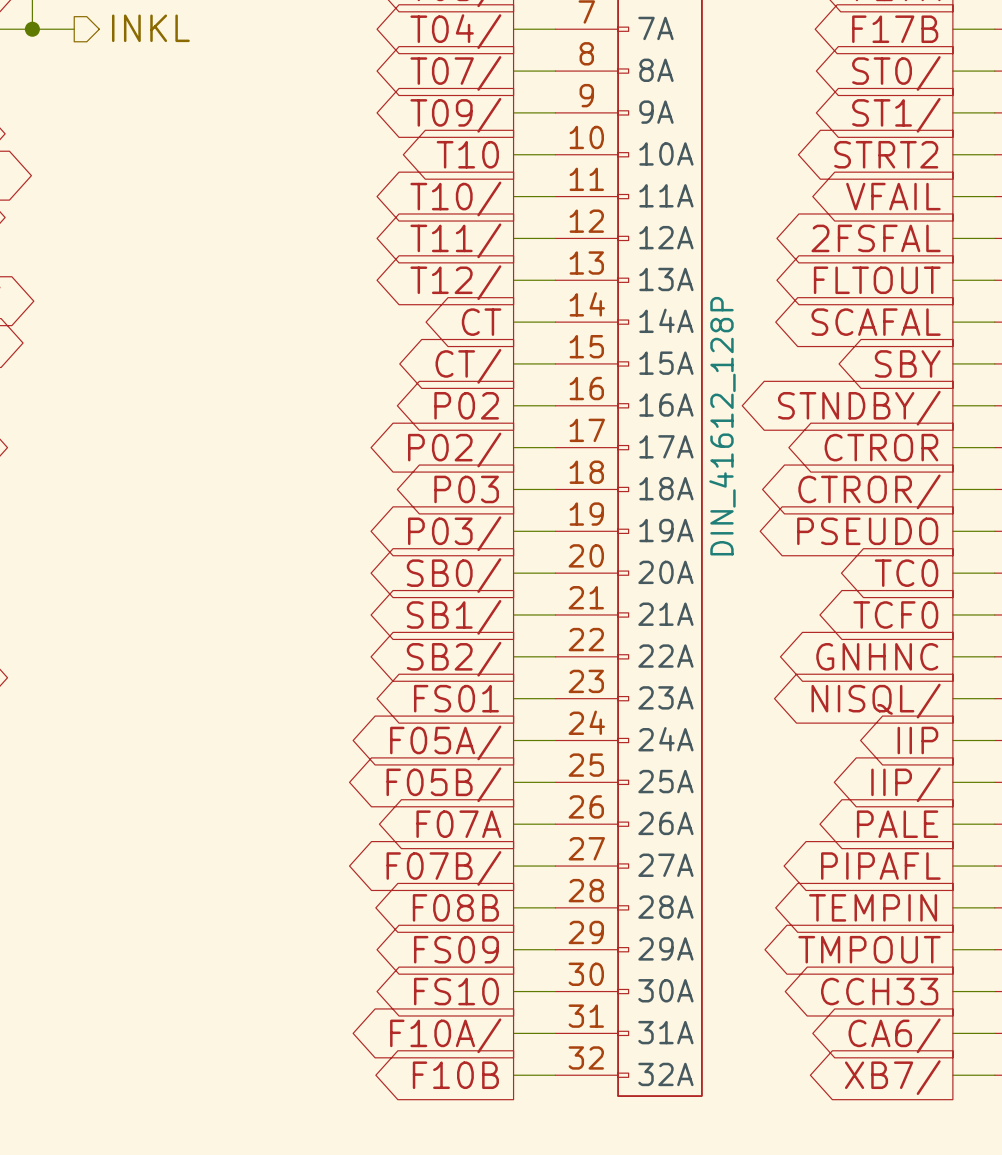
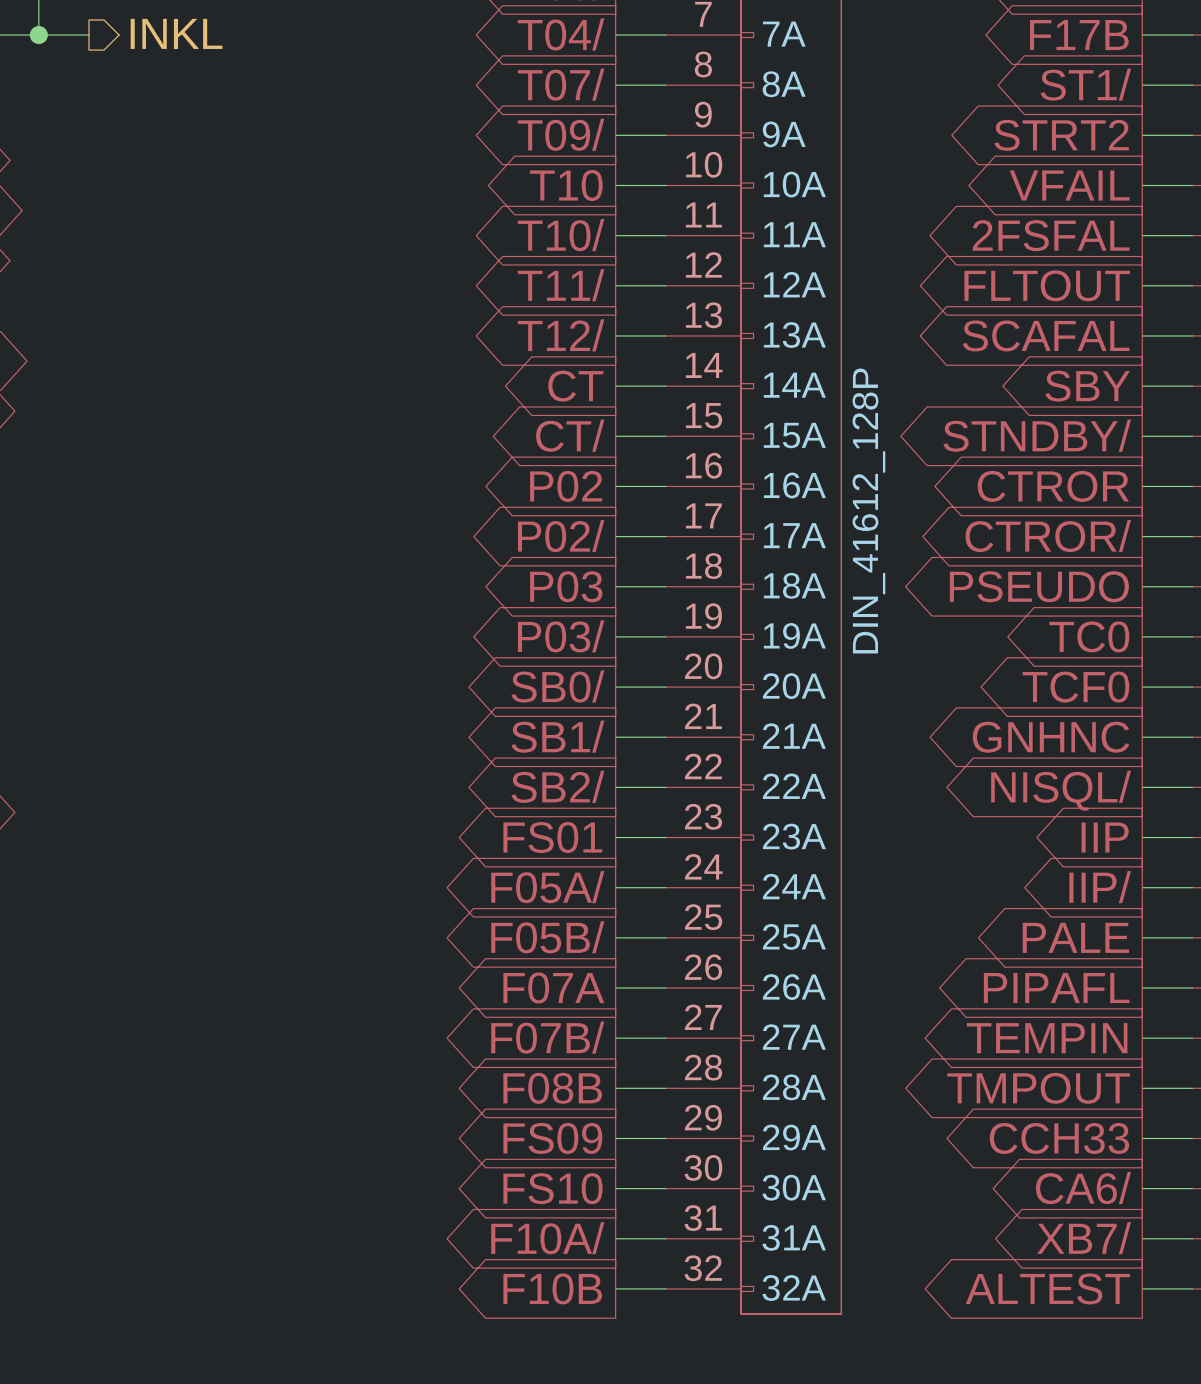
global label: ST0/ (896, 73) -> ST1/ (1085, 84)
global label: ST1/ (896, 115) -> STRT2 (1061, 135)
global label: STRT2 (886, 154) -> VFAIL (1069, 185)
global label: VFAIL (893, 196) -> 2FSFAL (1051, 235)
global label: 2FSFAL (876, 238) -> FLTOUT (1047, 285)
global label: FLTOUT (877, 280) -> SCAFAL (1046, 335)
global label: SCAFAL (876, 322) -> SBY (1087, 386)
global label: SBY (907, 363) -> STNDBY/ (1037, 435)
global label: STNDBY/ (859, 408) -> CTROR (1053, 486)
global label: CTROR (881, 447) -> CTROR/ (1048, 536)
global label: CTROR/ (869, 491) -> PSEUDO (1039, 586)
global label: PSEUDO (867, 531) -> TC0 (1089, 636)
global label: TC0 (906, 573) -> TCF0 (1075, 687)
global label: TCF0 (895, 614) -> GNHNC (1051, 737)
global label: GNHNC (877, 656) -> NISQL/ (1061, 790)
global label: NISQL/ (876, 701) -> IIP (1105, 837)
global label: IIP (917, 740) -> IIP/ (1100, 887)
global label: IIP/ (905, 784) -> PALE (1075, 937)
global label: PALE (897, 824) -> PIPAFL (1056, 988)
global label: PIPAFL (880, 866) -> TEMPIN (1047, 1038)
global label: TEMPIN (873, 907) -> TMPOUT (1038, 1088)
global label: TMPOUT (869, 949) -> CCH33 (1059, 1138)
global label: CCH33 (879, 991) -> CA6/ (1083, 1188)
global label: CA6/ (894, 1035) -> XB7/ (1084, 1238)
global label: XB7/ (892, 1077) -> ALTEST (1047, 1288)

